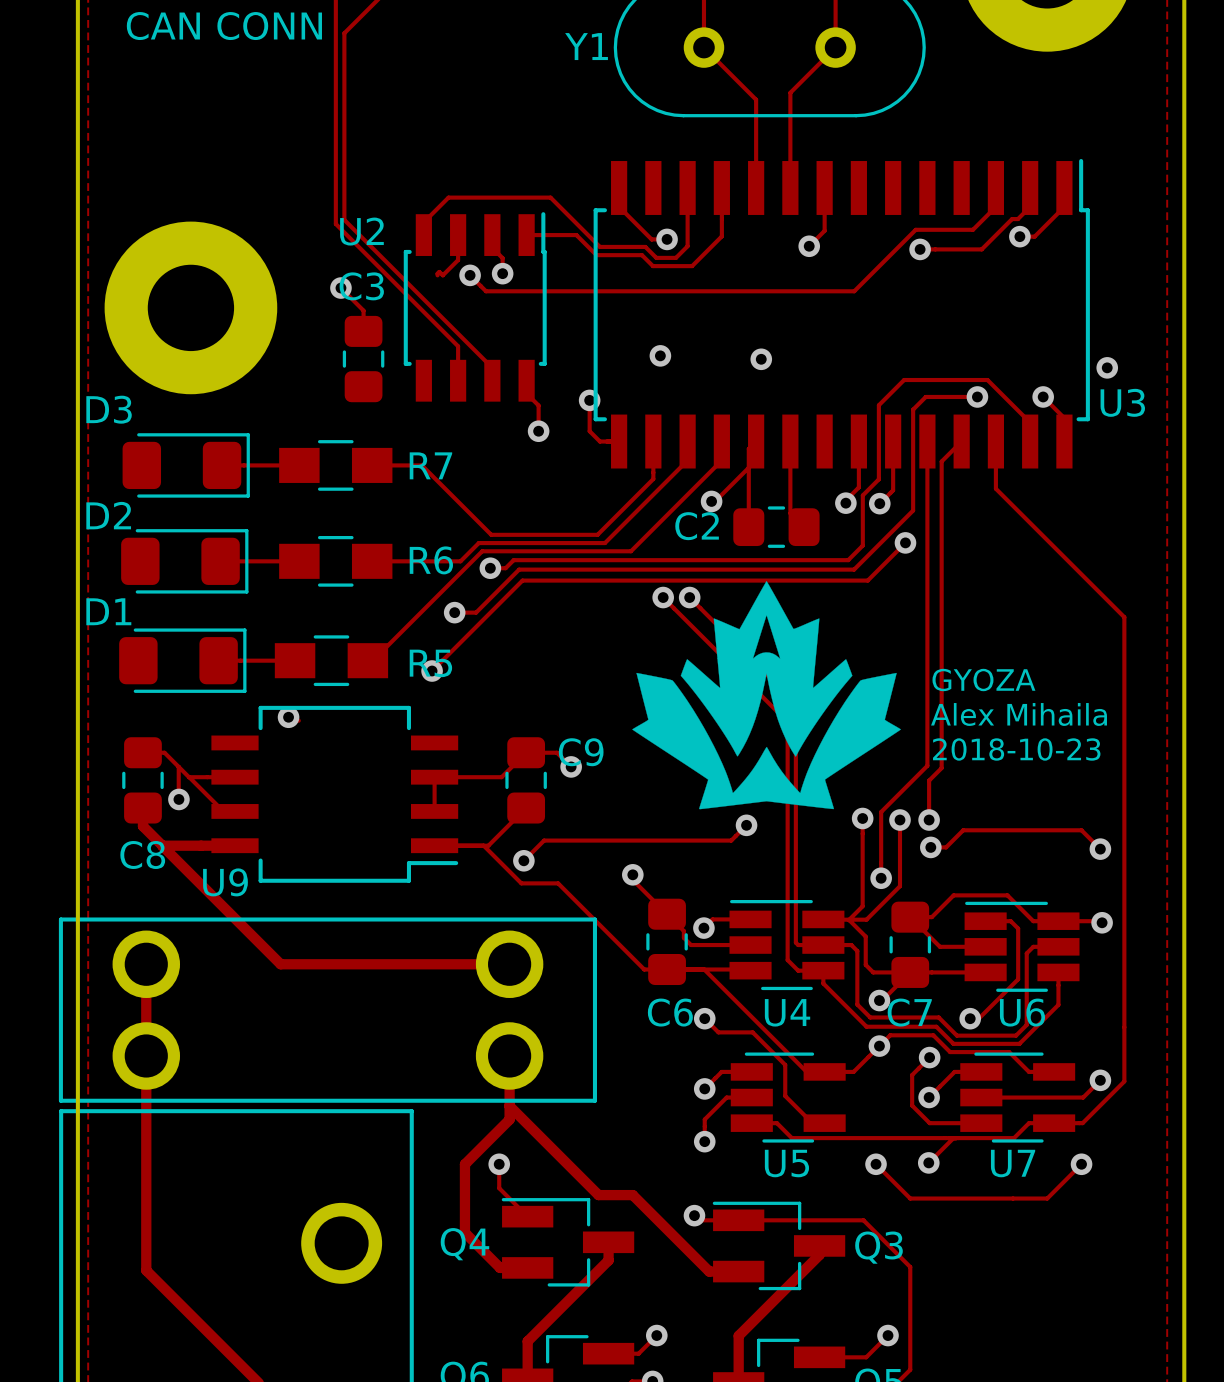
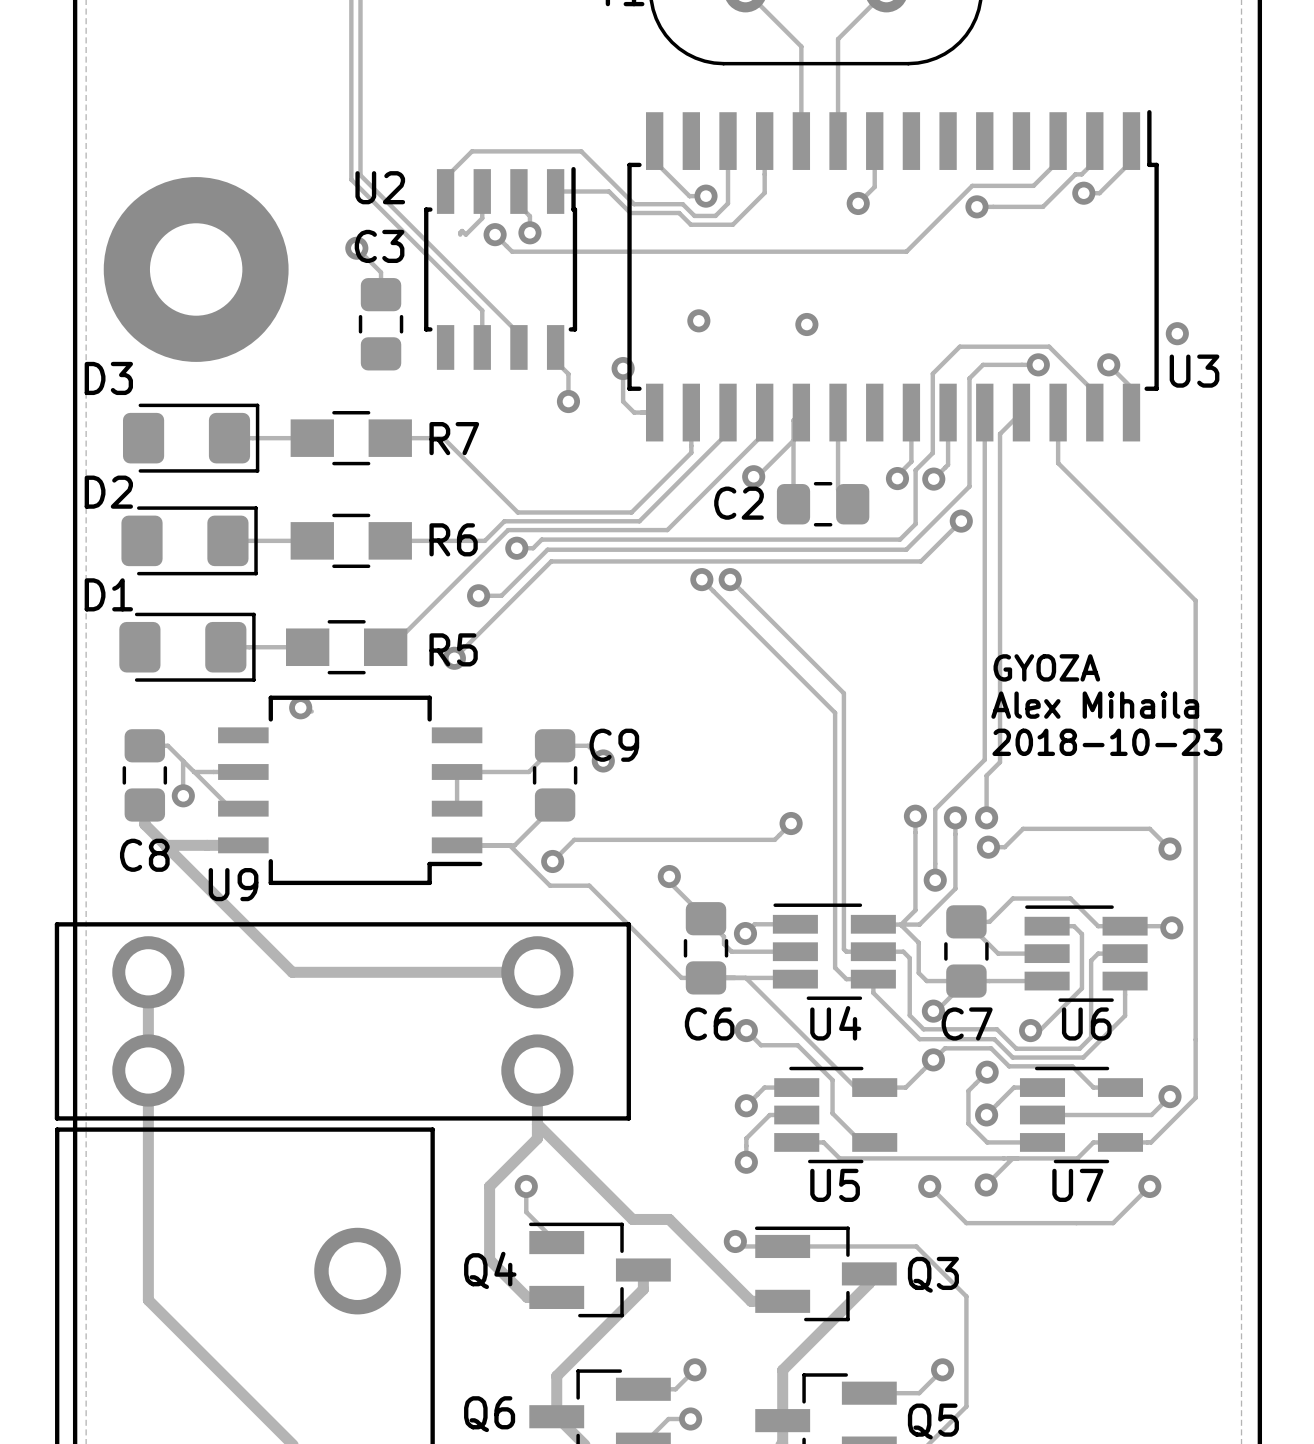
drawing: [632, 581, 901, 810] -> none

